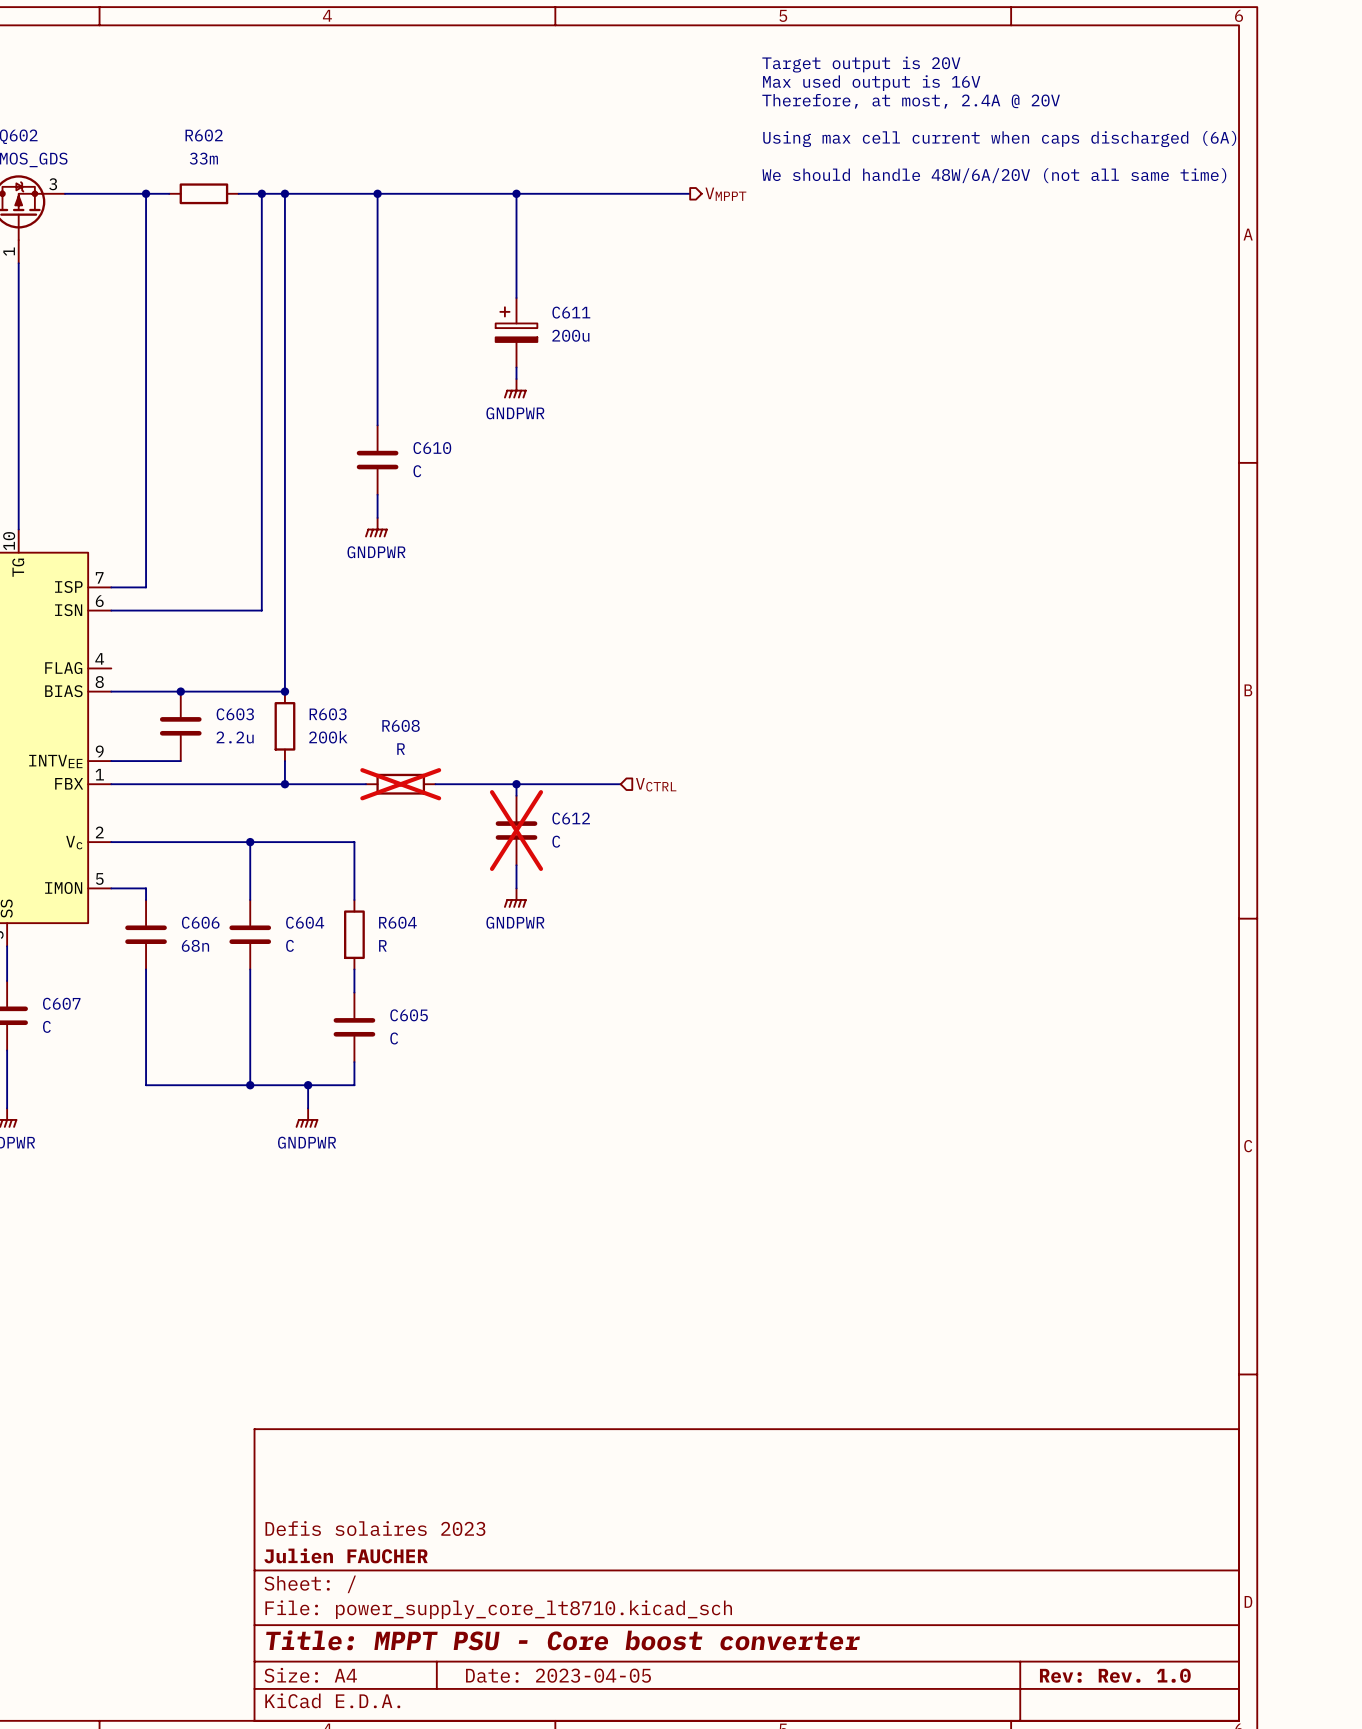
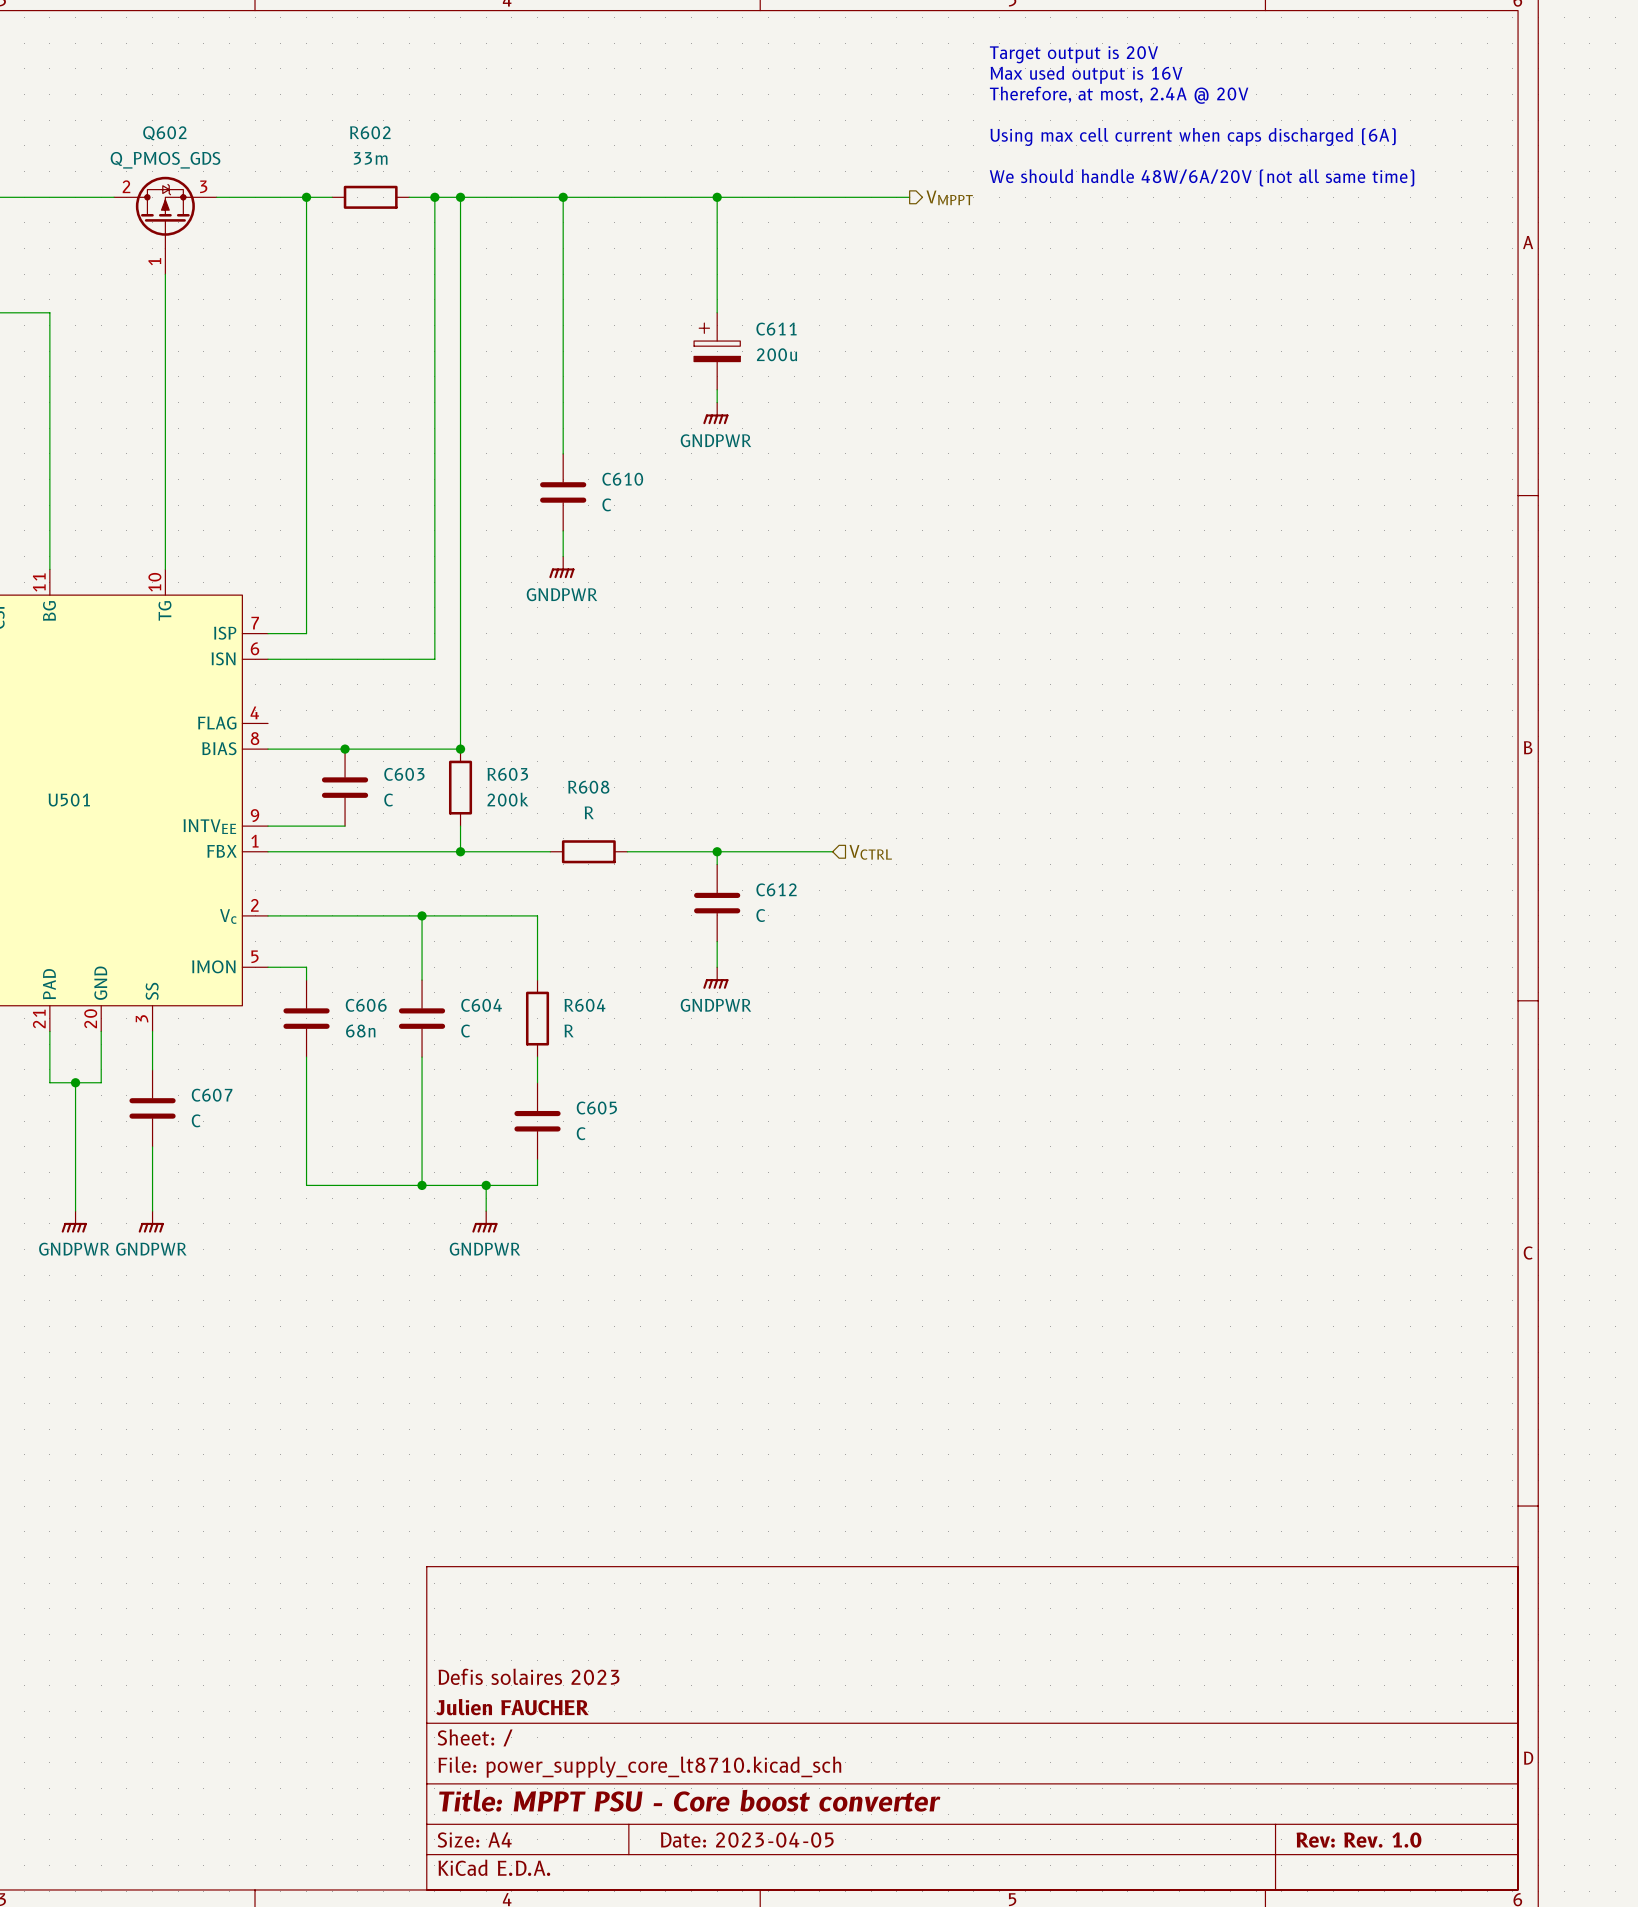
C603 value: 2.2u (235, 737) -> C (388, 800)
R608 do-not-place cross: (400, 784) -> none
C612 do-not-place cross: (516, 830) -> none

